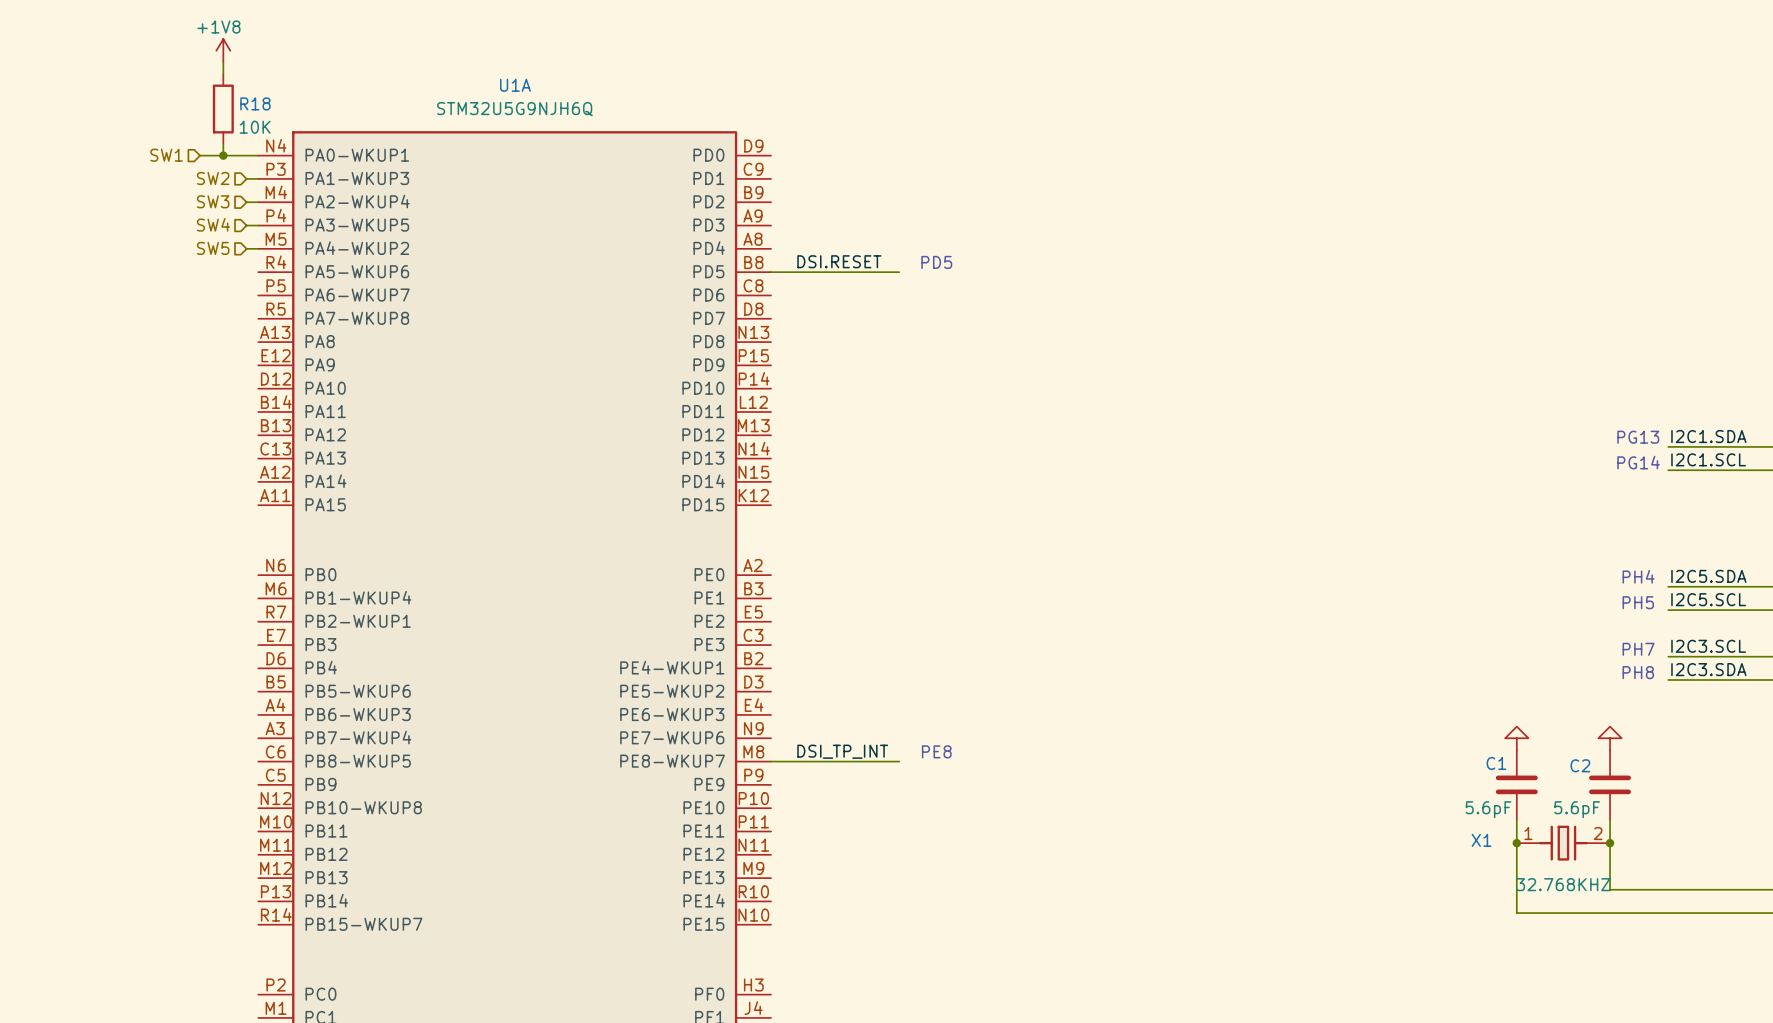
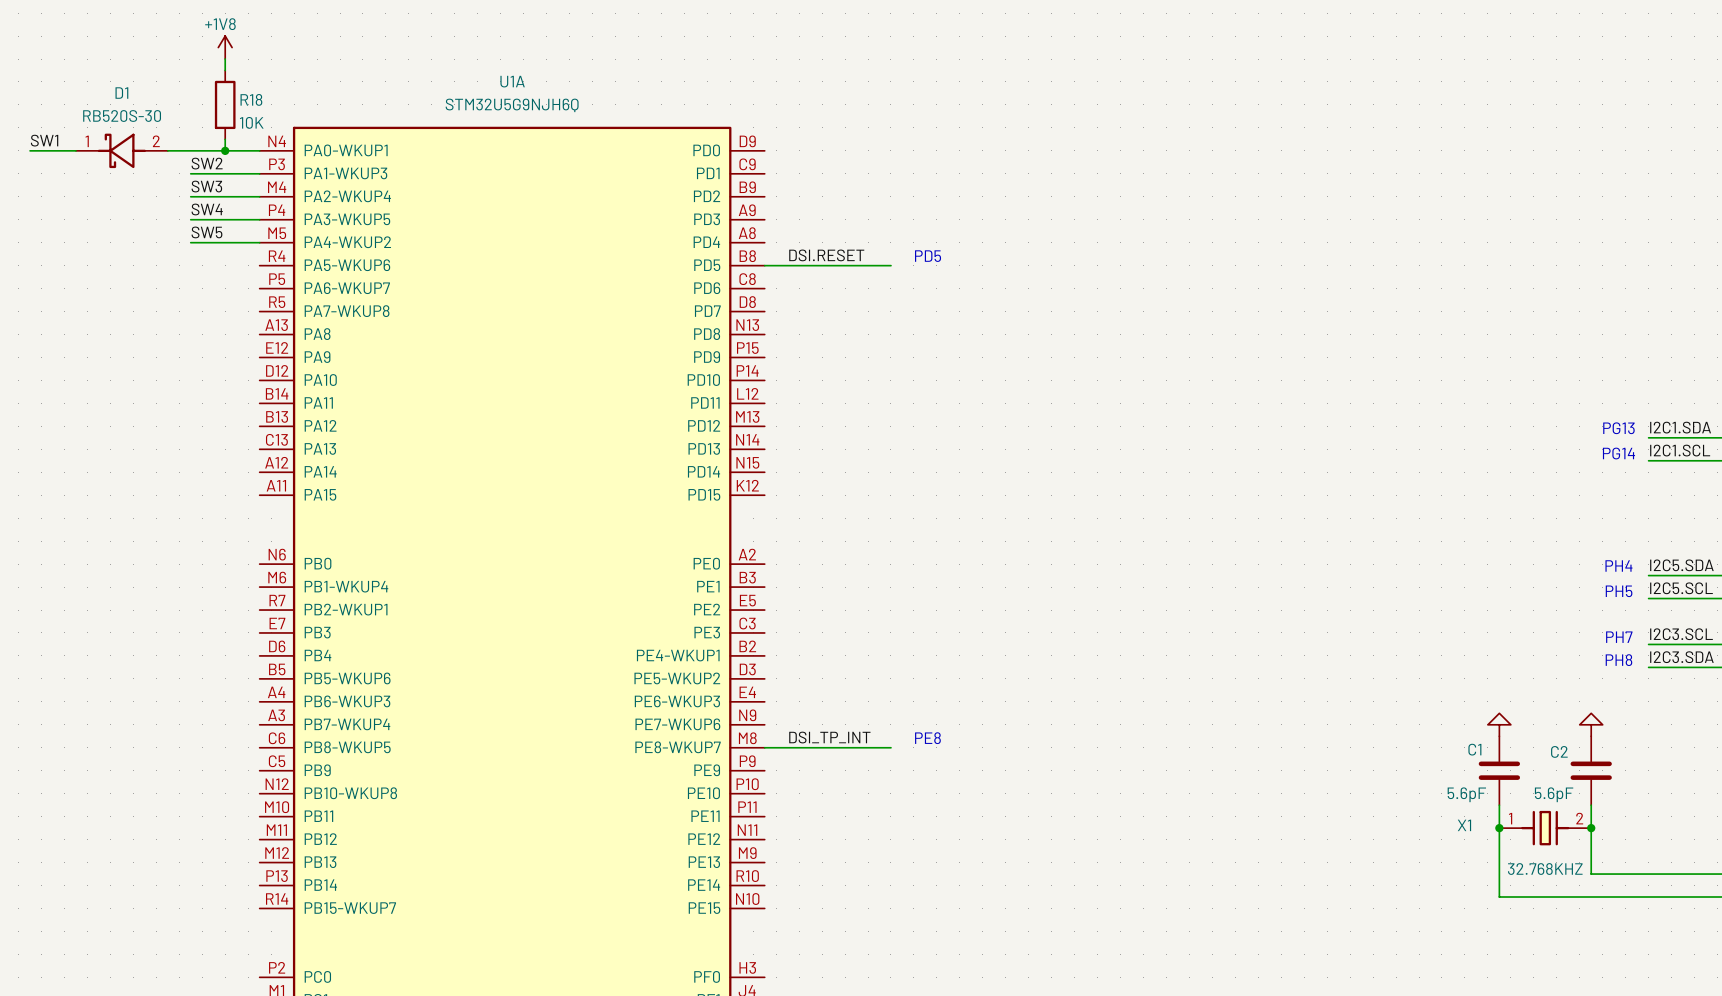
label: none -> SW1 (44, 140)
wire: none -> (30, 150) (75, 150)
D1: none -> RB520S-30 (121, 150)
wire: none -> (167, 150) (202, 150)
hierarchical label: SW1 (166, 155) -> none
label: none -> SW2 (207, 163)
wire: none -> (190, 173) (248, 173)
hierarchical label: SW2 (213, 178) -> none
label: none -> SW3 (206, 186)
hierarchical label: SW3 (213, 201) -> none
wire: none -> (190, 196) (248, 196)
label: none -> SW4 (207, 209)
hierarchical label: SW4 (213, 224) -> none
wire: none -> (190, 219) (248, 219)
label: none -> SW5 (206, 232)
wire: none -> (190, 242) (248, 242)
hierarchical label: SW5 (213, 248) -> none

